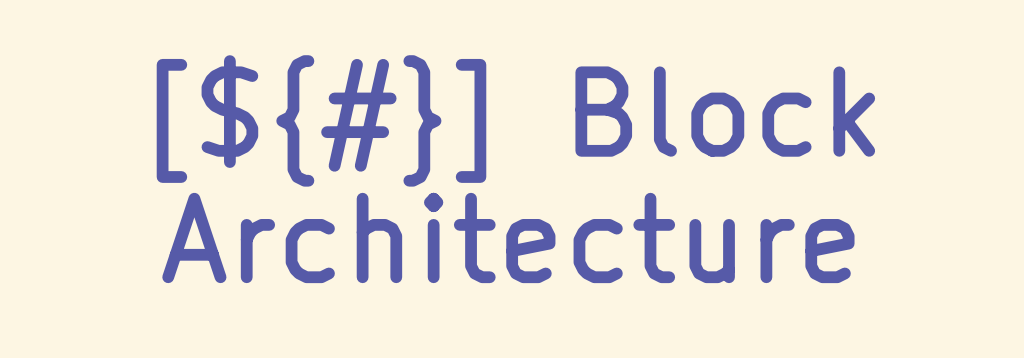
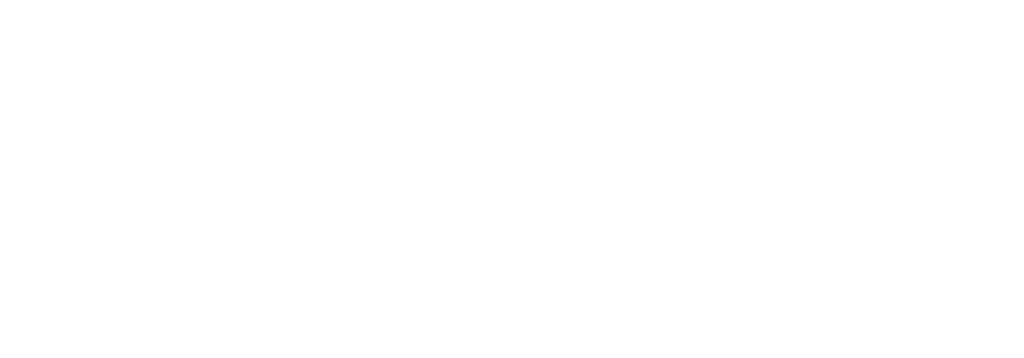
text: [${#}] Block (515, 120) -> none
text: Architecture (508, 237) -> none

